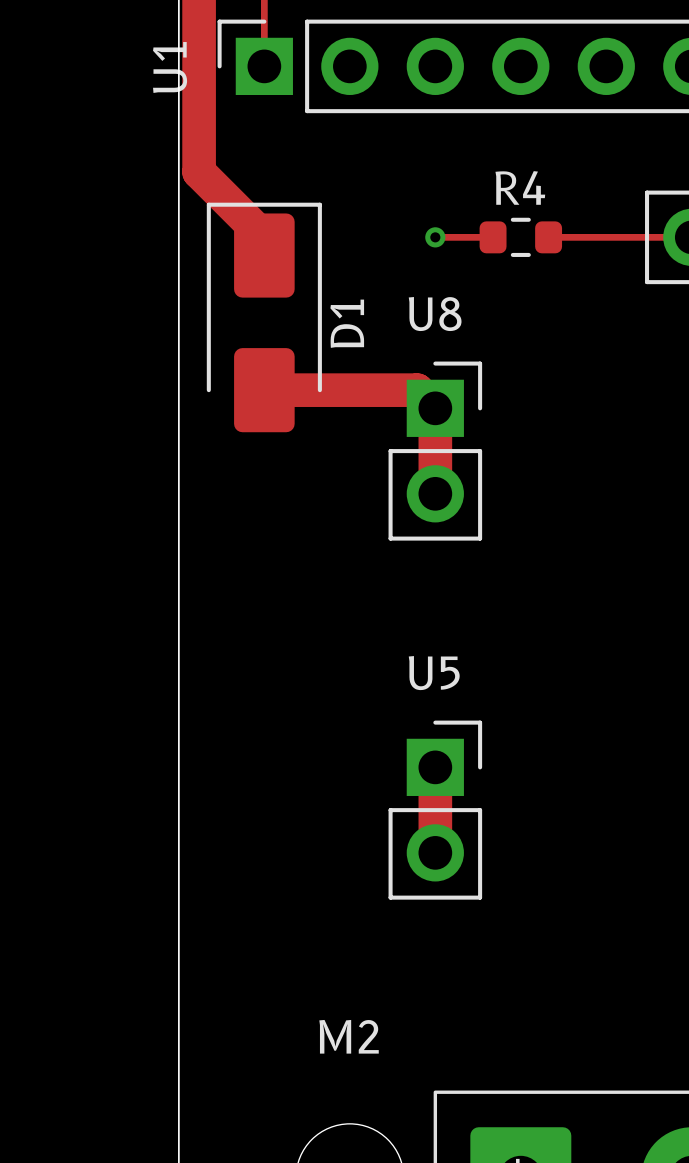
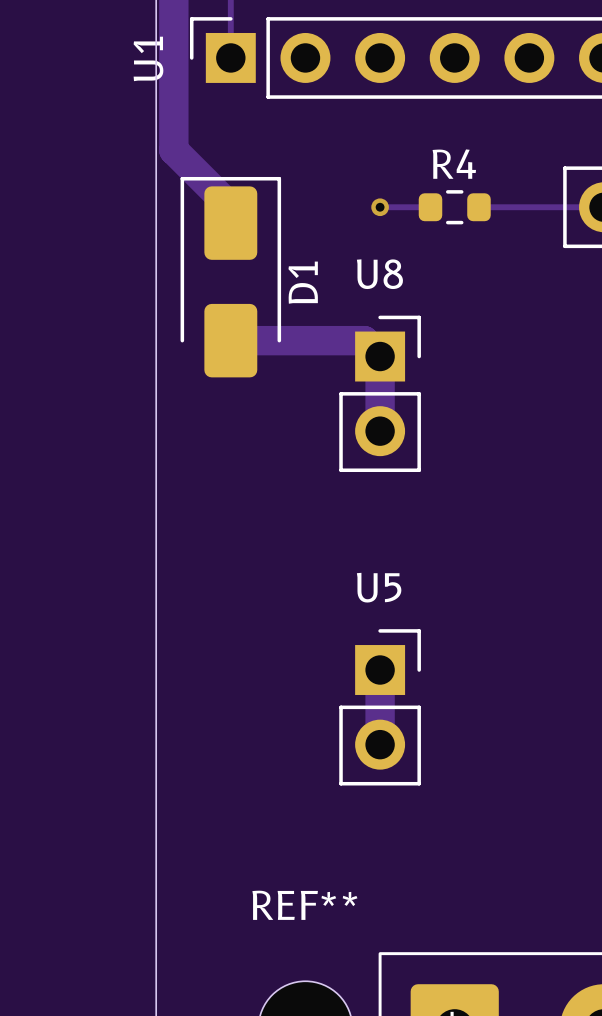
M2 name: M2 (349, 1036) -> REF** (304, 905)

